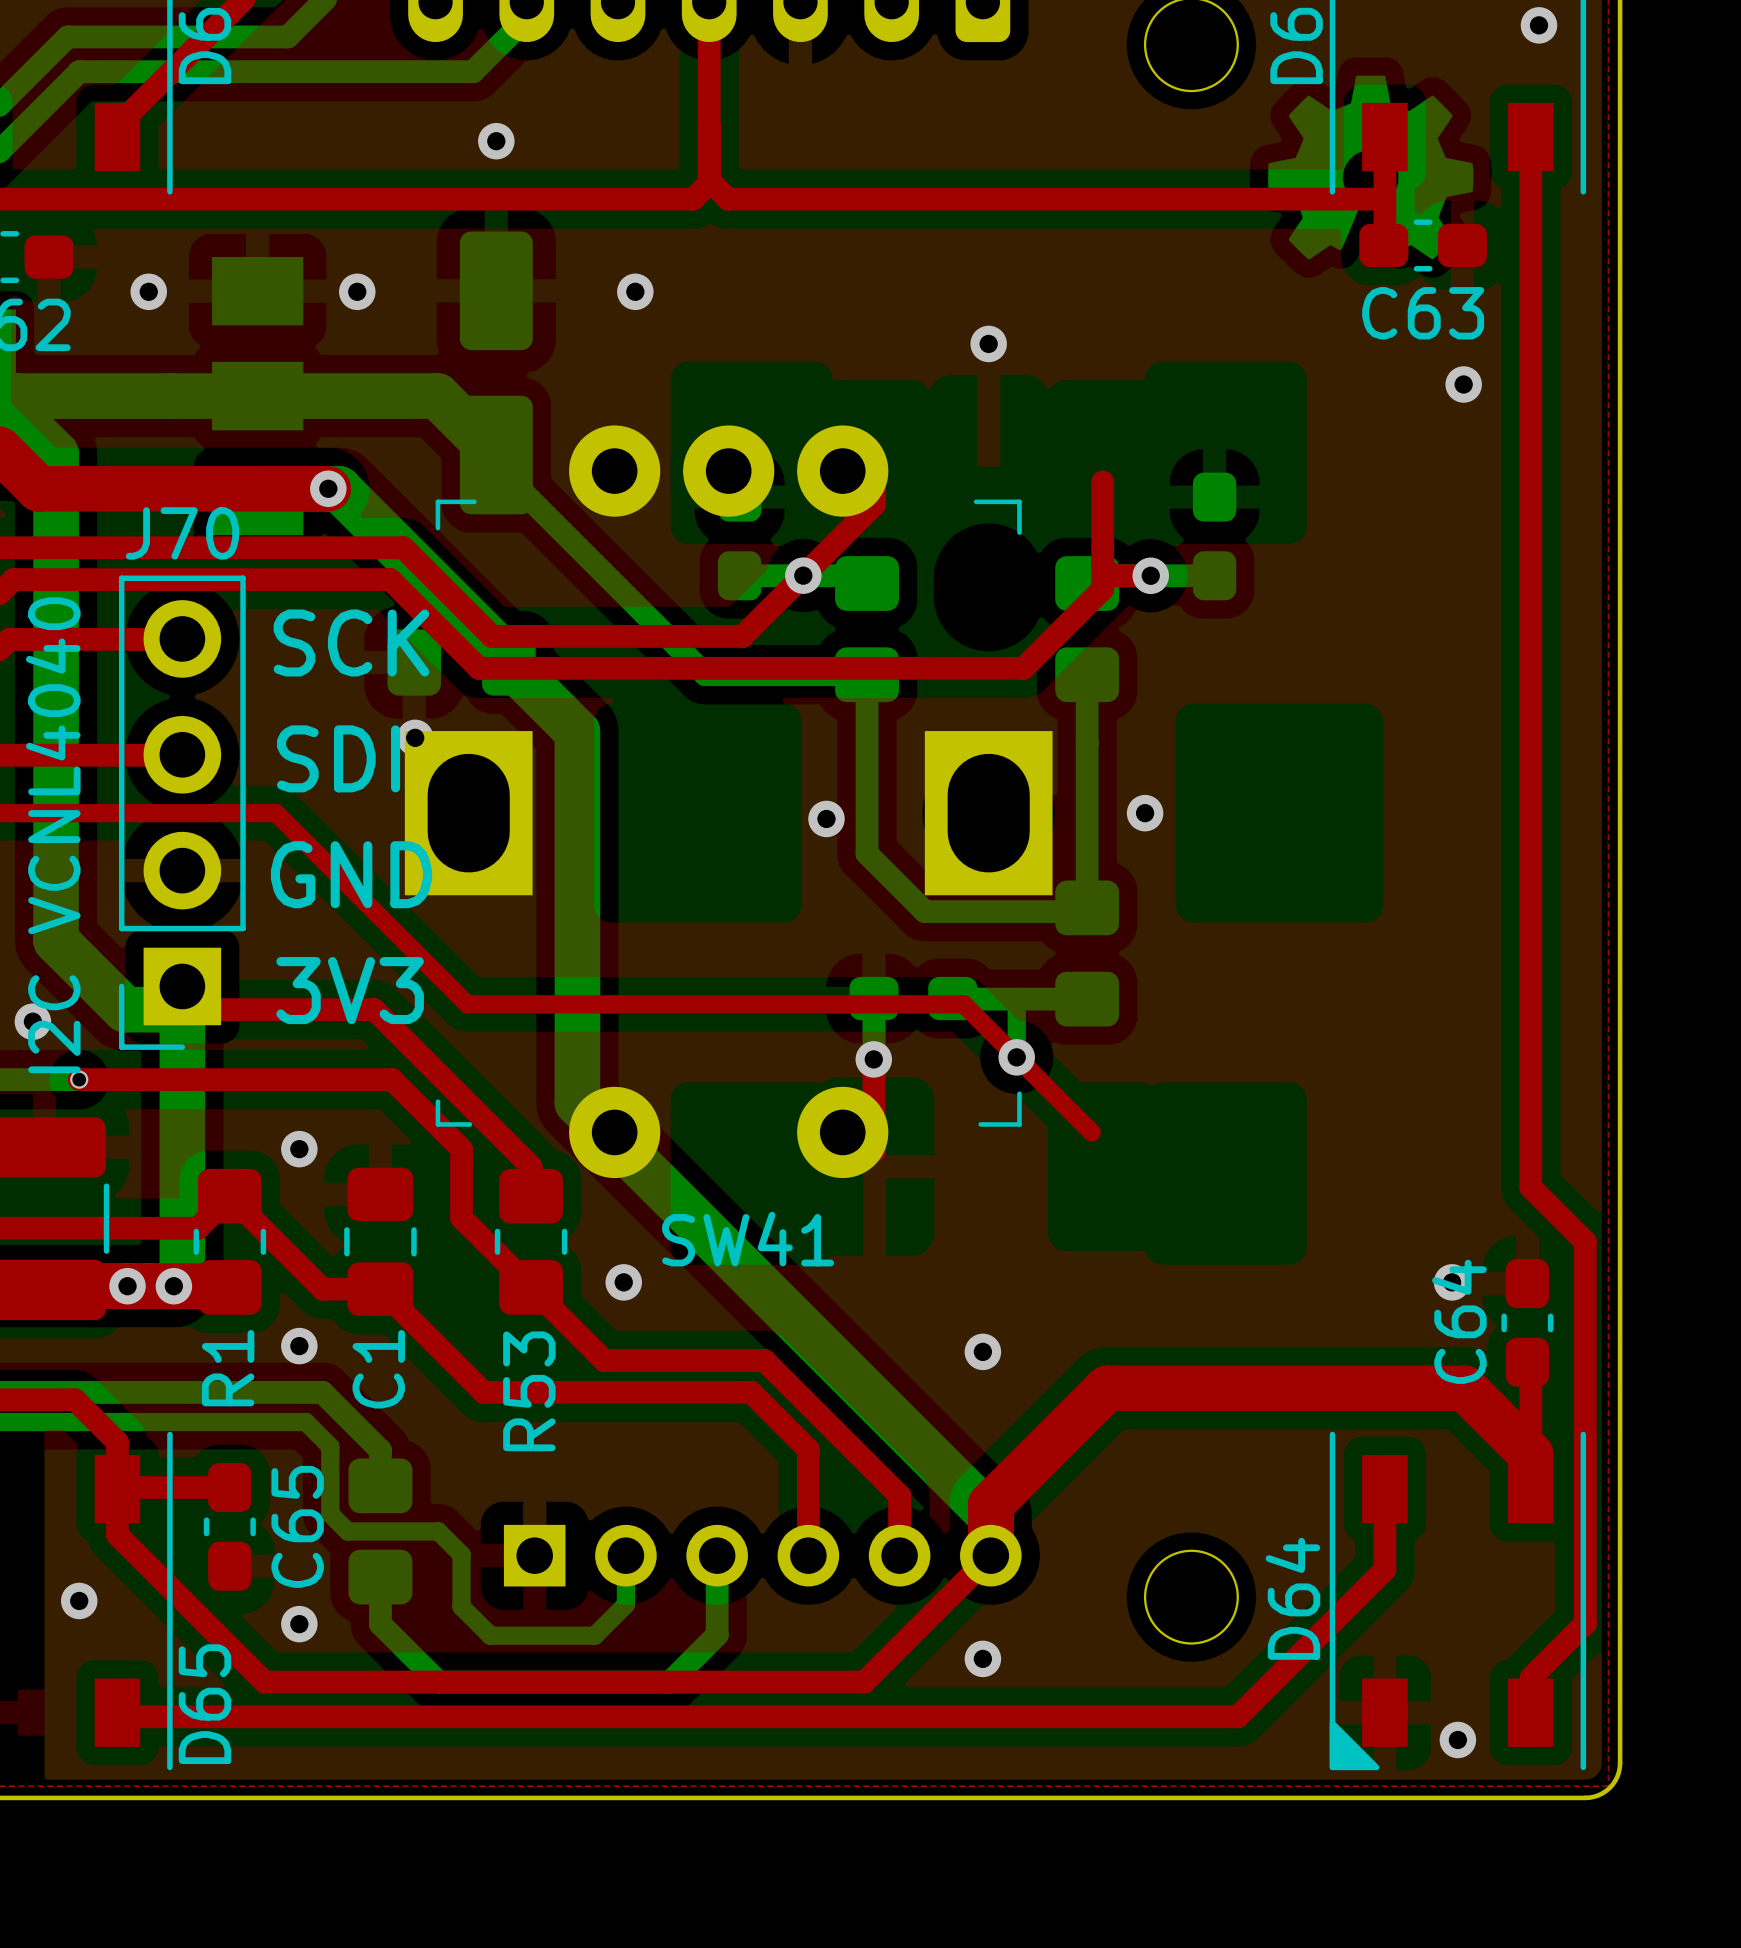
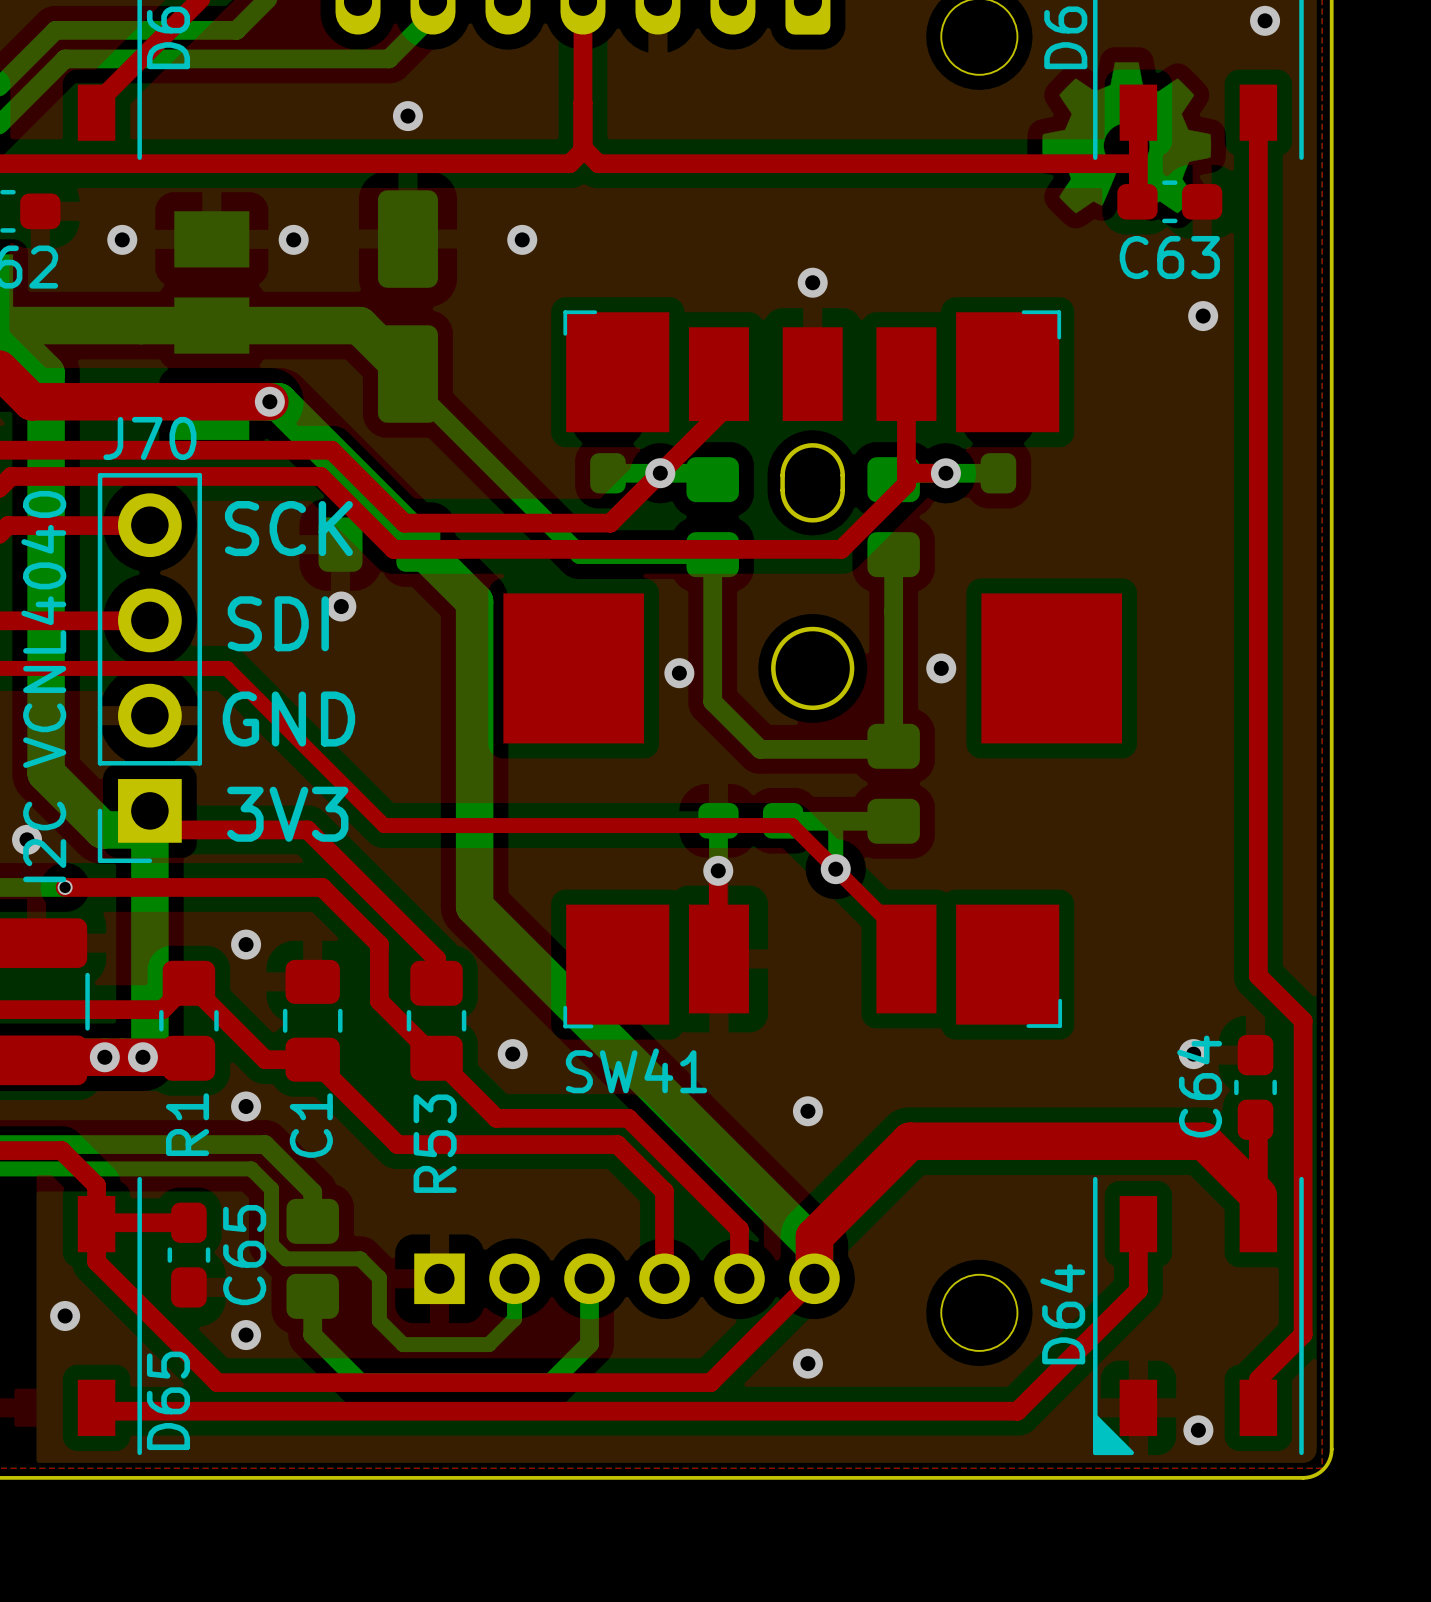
SW41 footprint: [404, 425, 1053, 1179] -> [503, 310, 1123, 1029]
SW41 name position: SW41 (748, 1239) -> SW41 (636, 1070)

